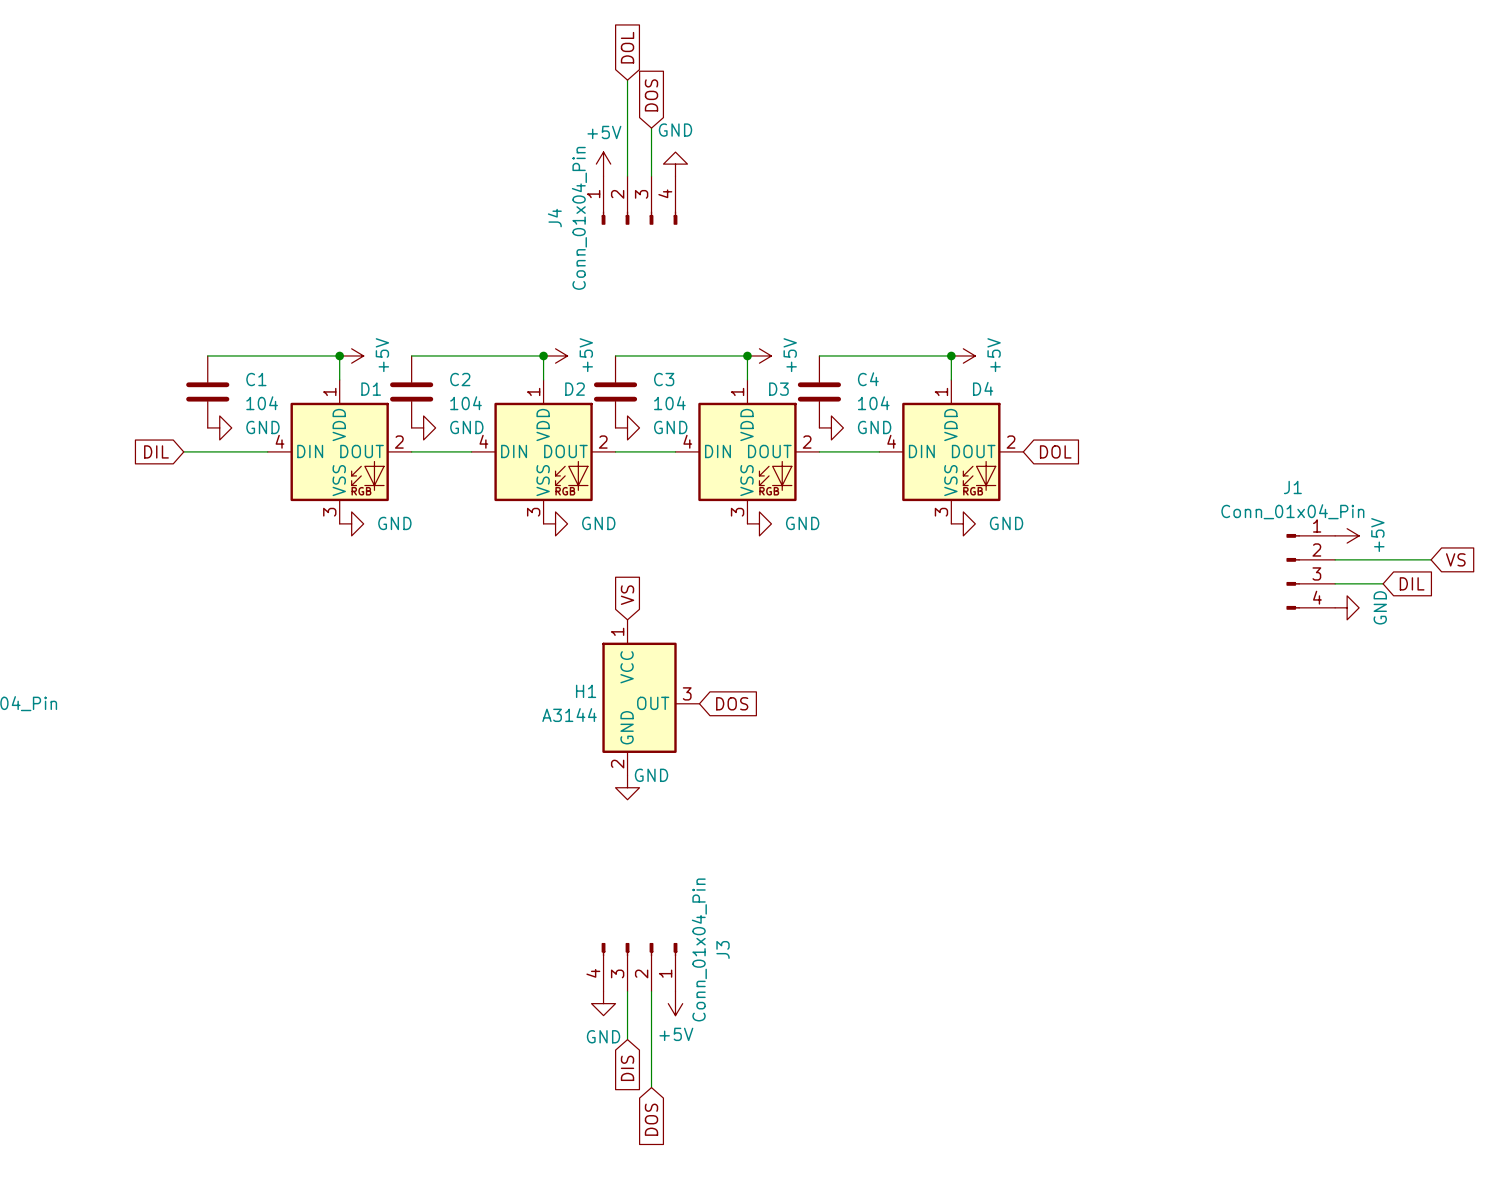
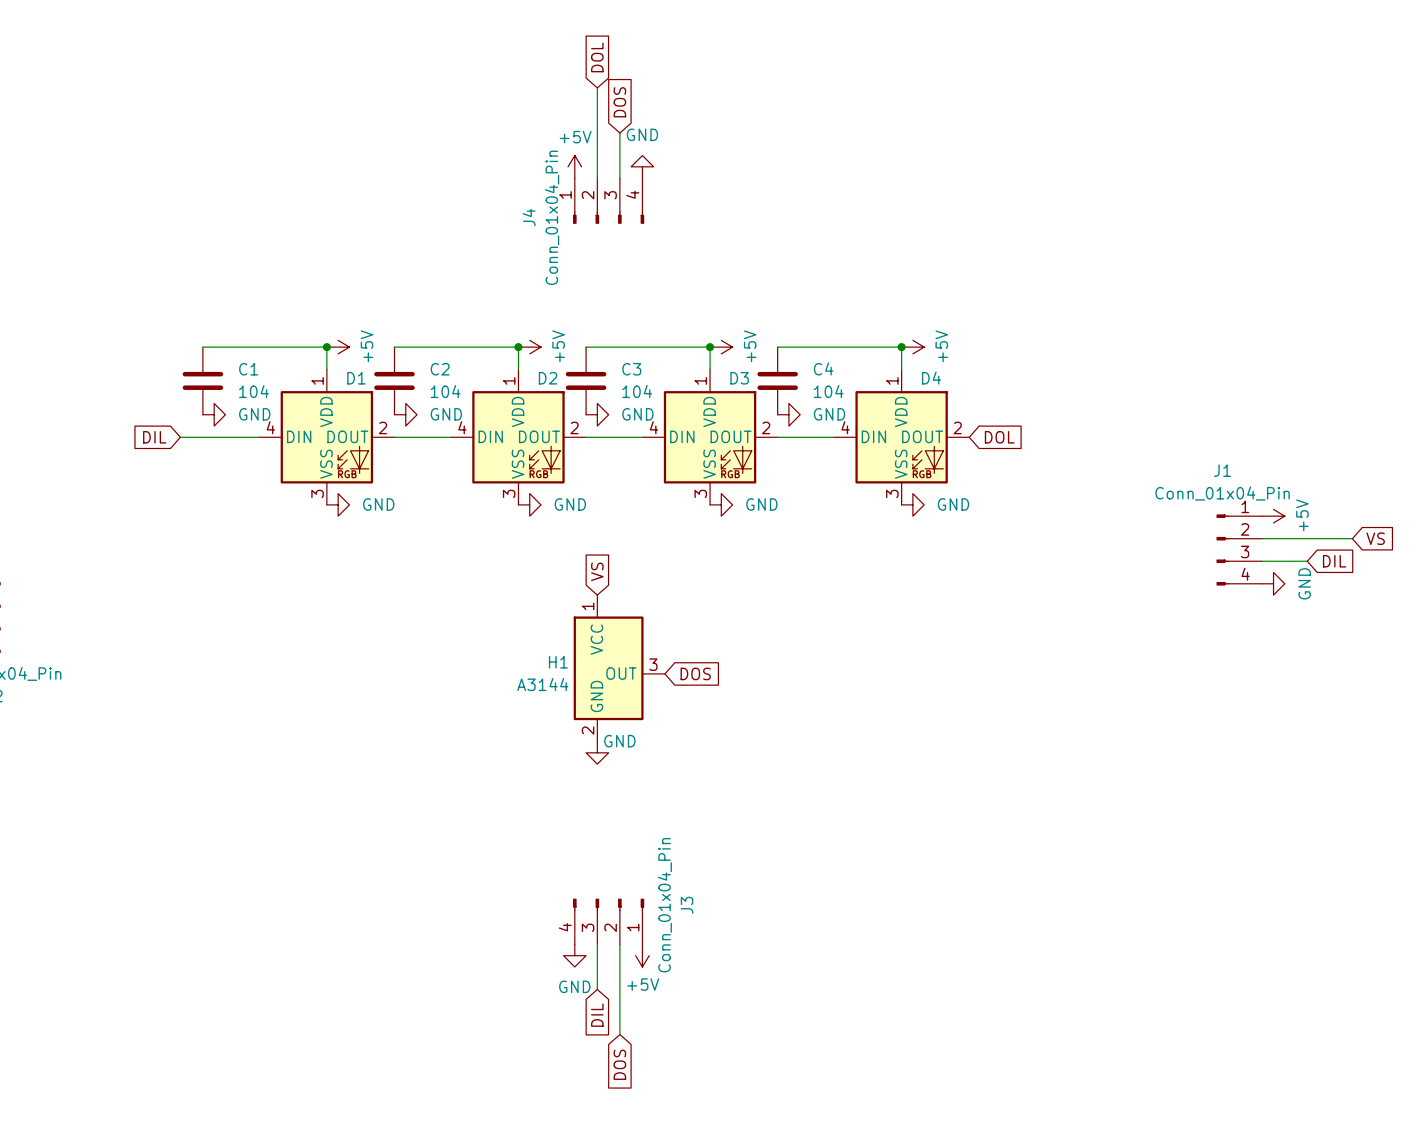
global label: DIS (627, 1068) -> DIL (597, 1015)

